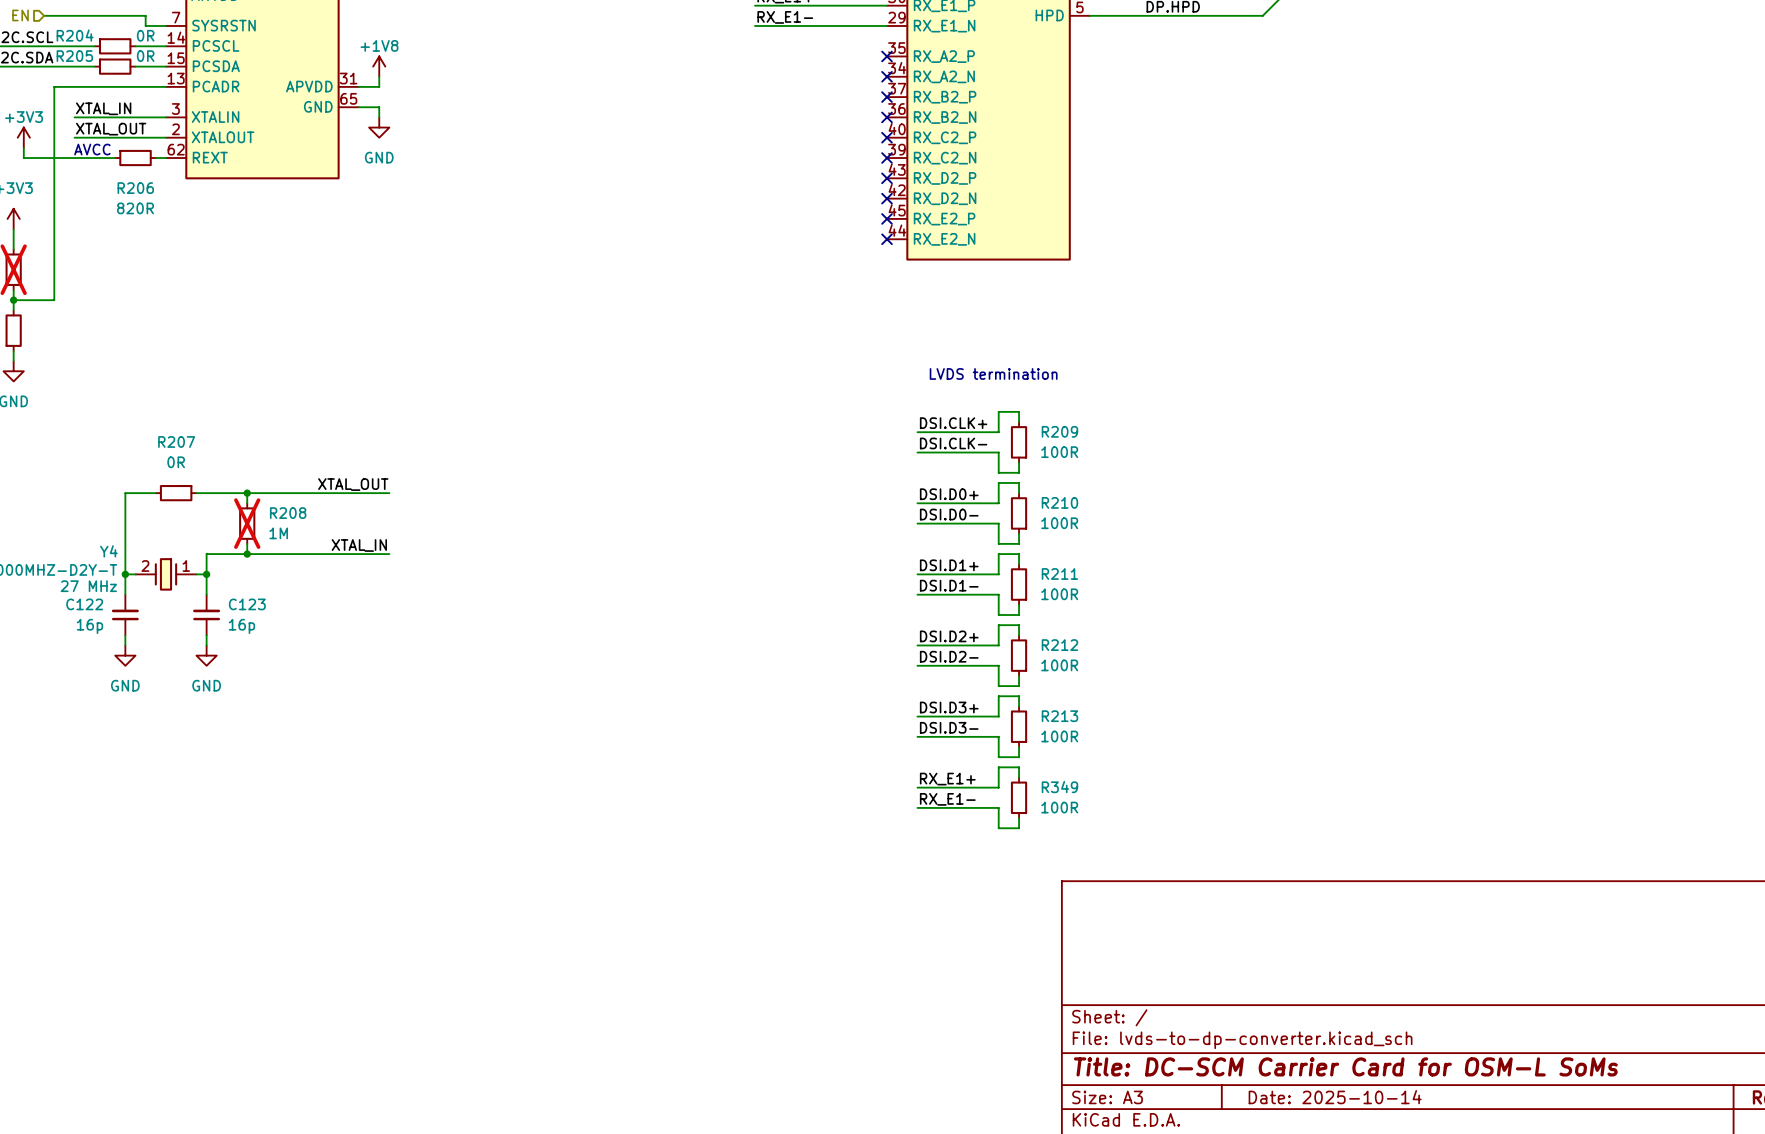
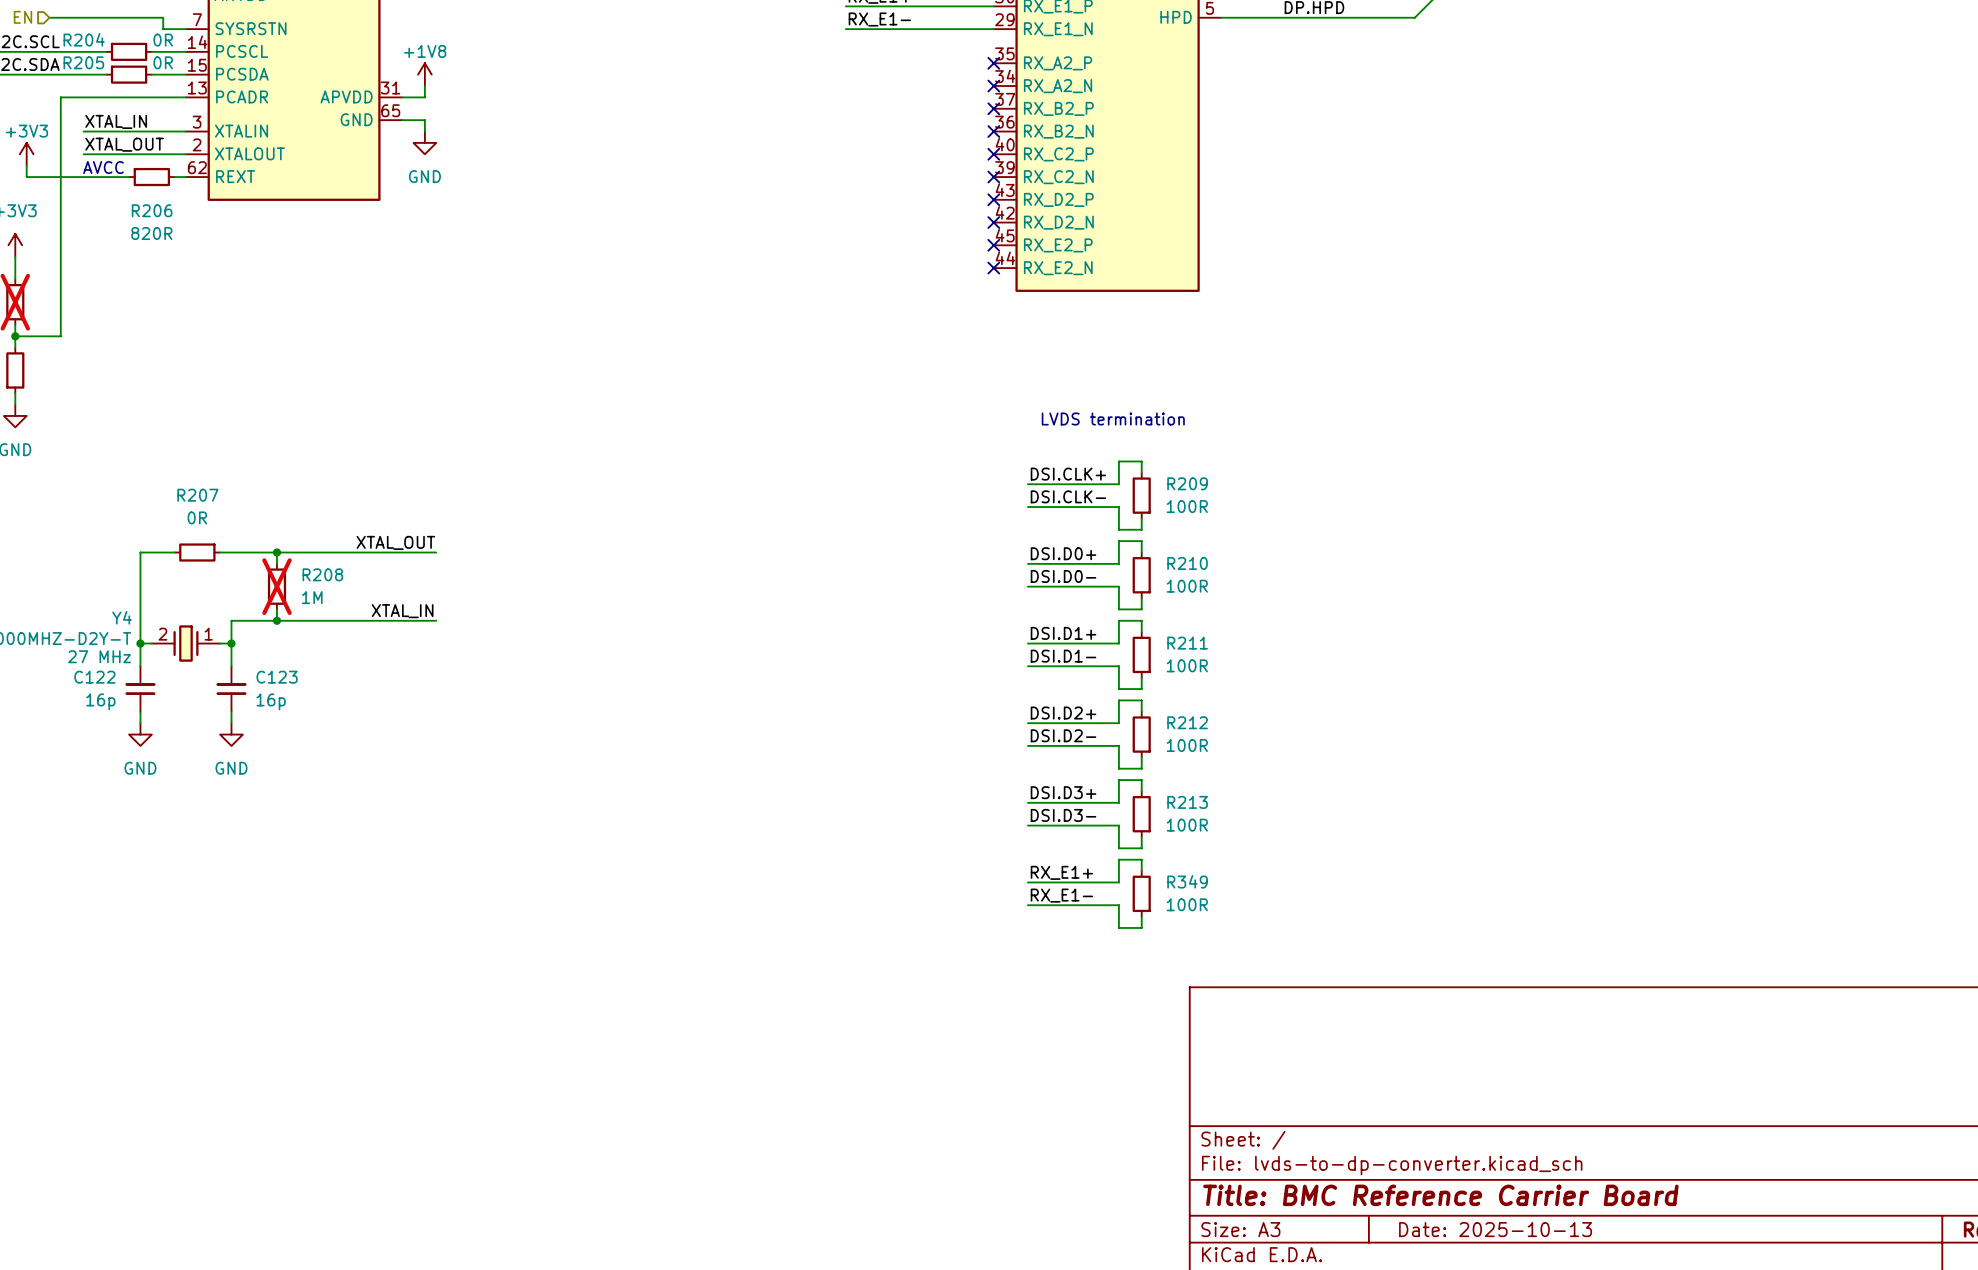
title block: Title: DC-SCM Carrier Card for OSM-L SoMs (1345, 1066) -> Title: BMC Reference Carrier Board (1440, 1195)
title block: Date: 2025-10-14 (1335, 1097) -> Date: 2025-10-13 (1495, 1229)

